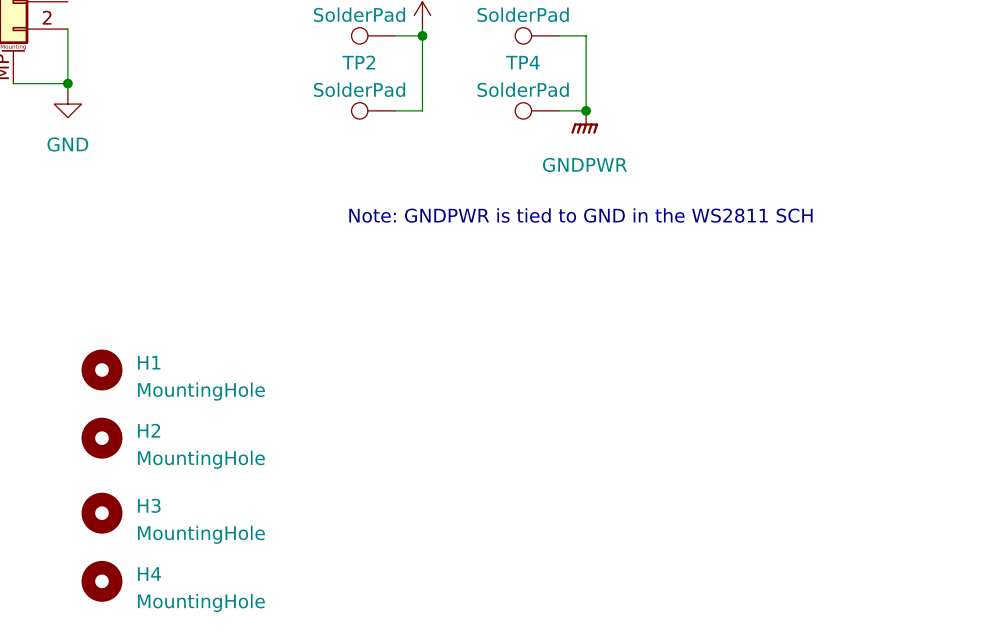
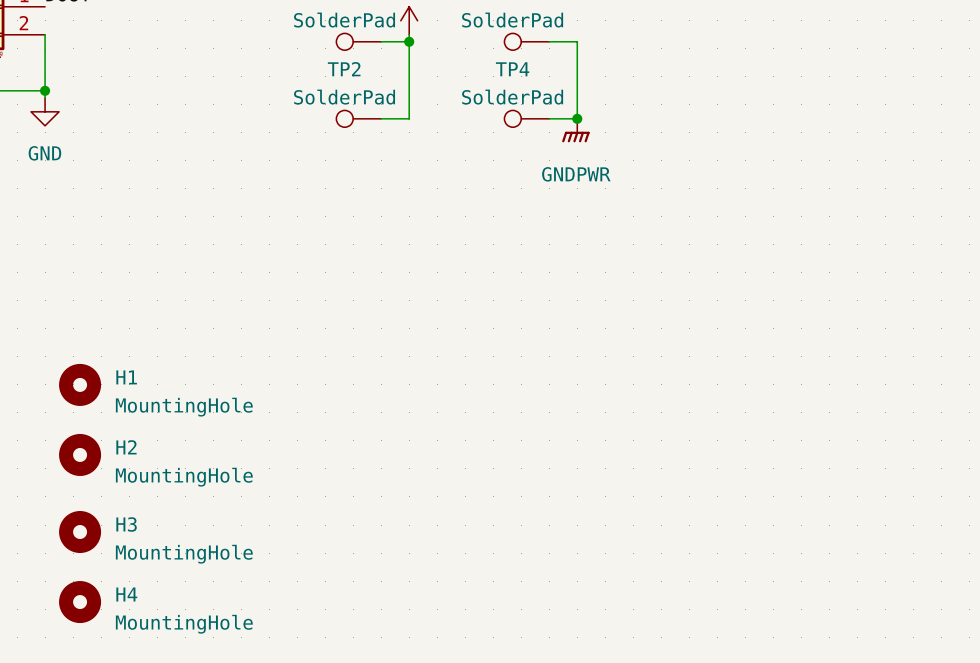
text: Note: GNDPWR is tied to GND in the WS2811 SCH (580, 215) -> none

